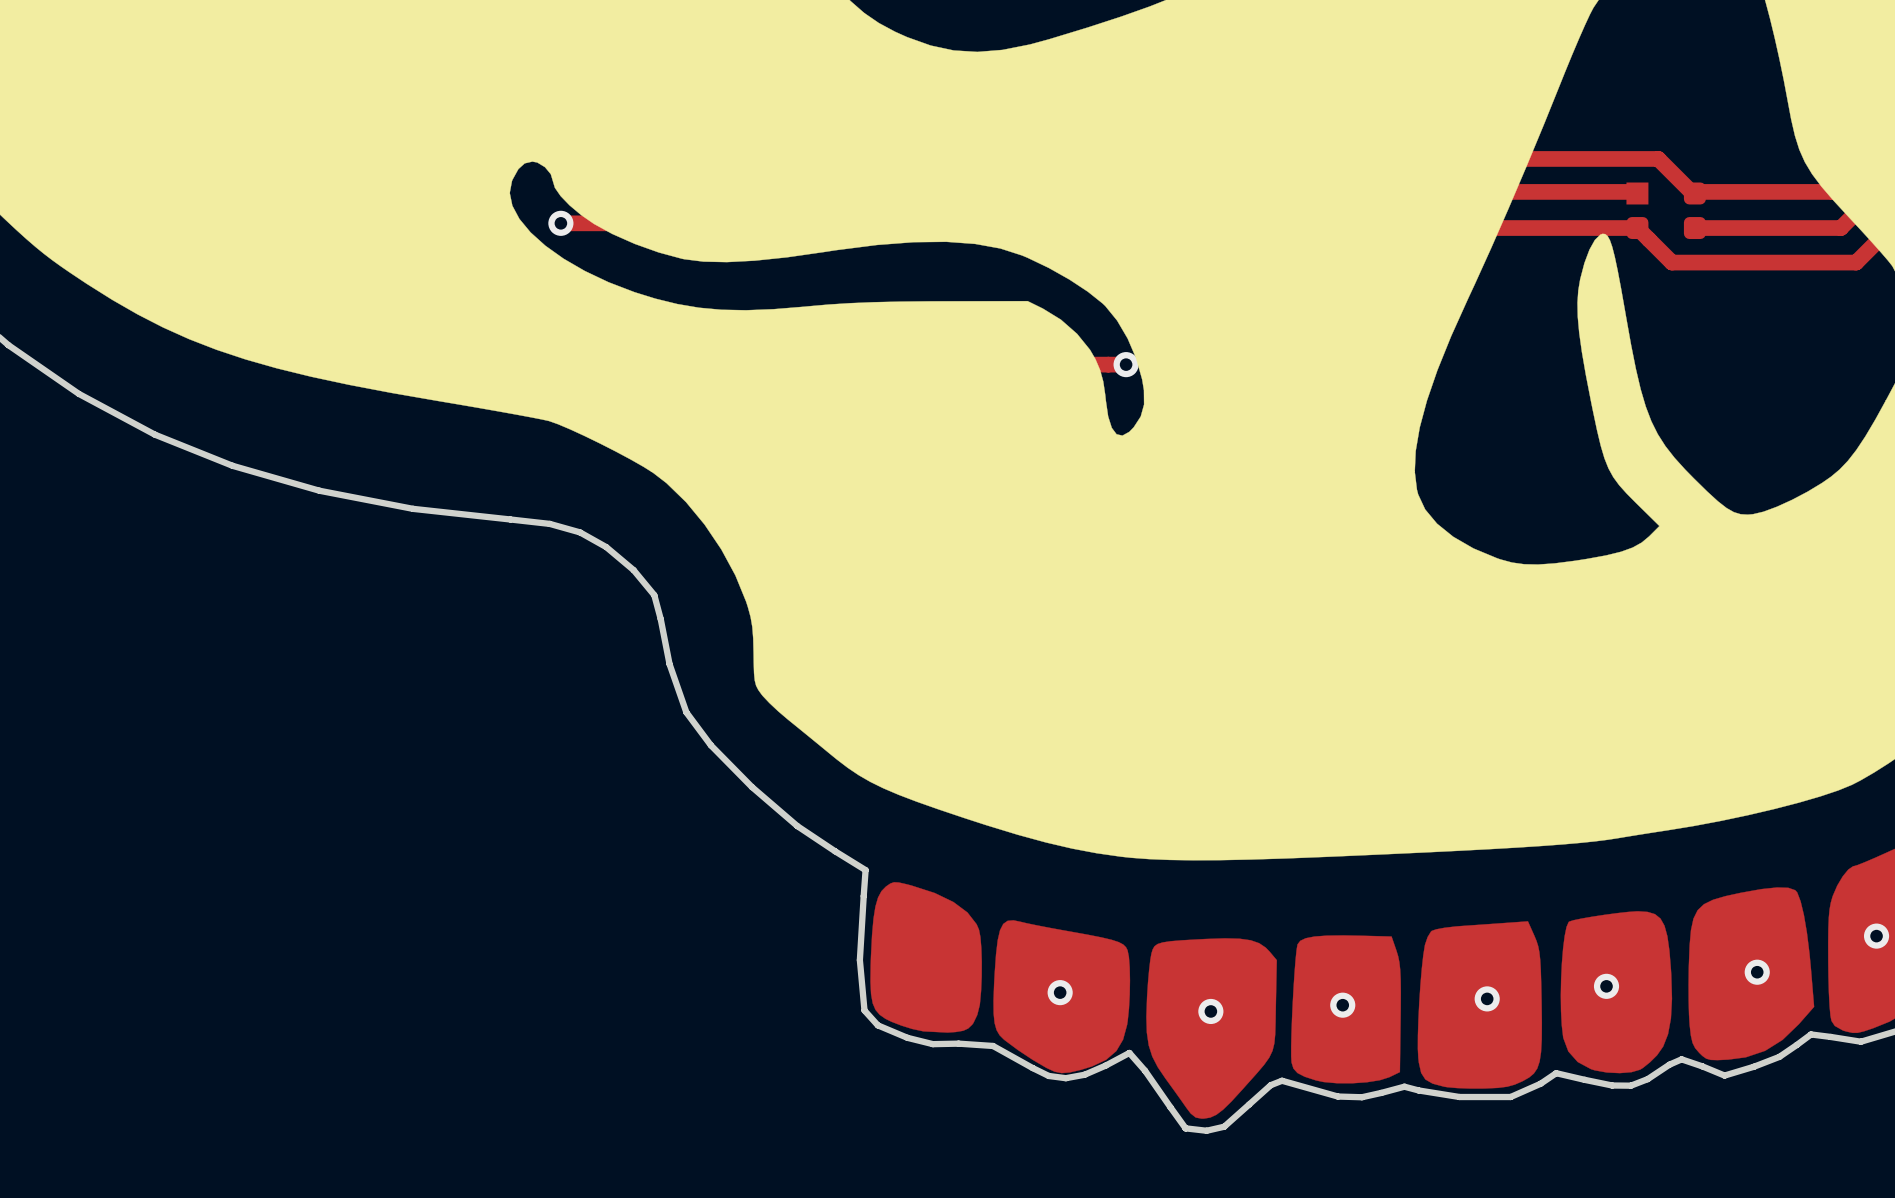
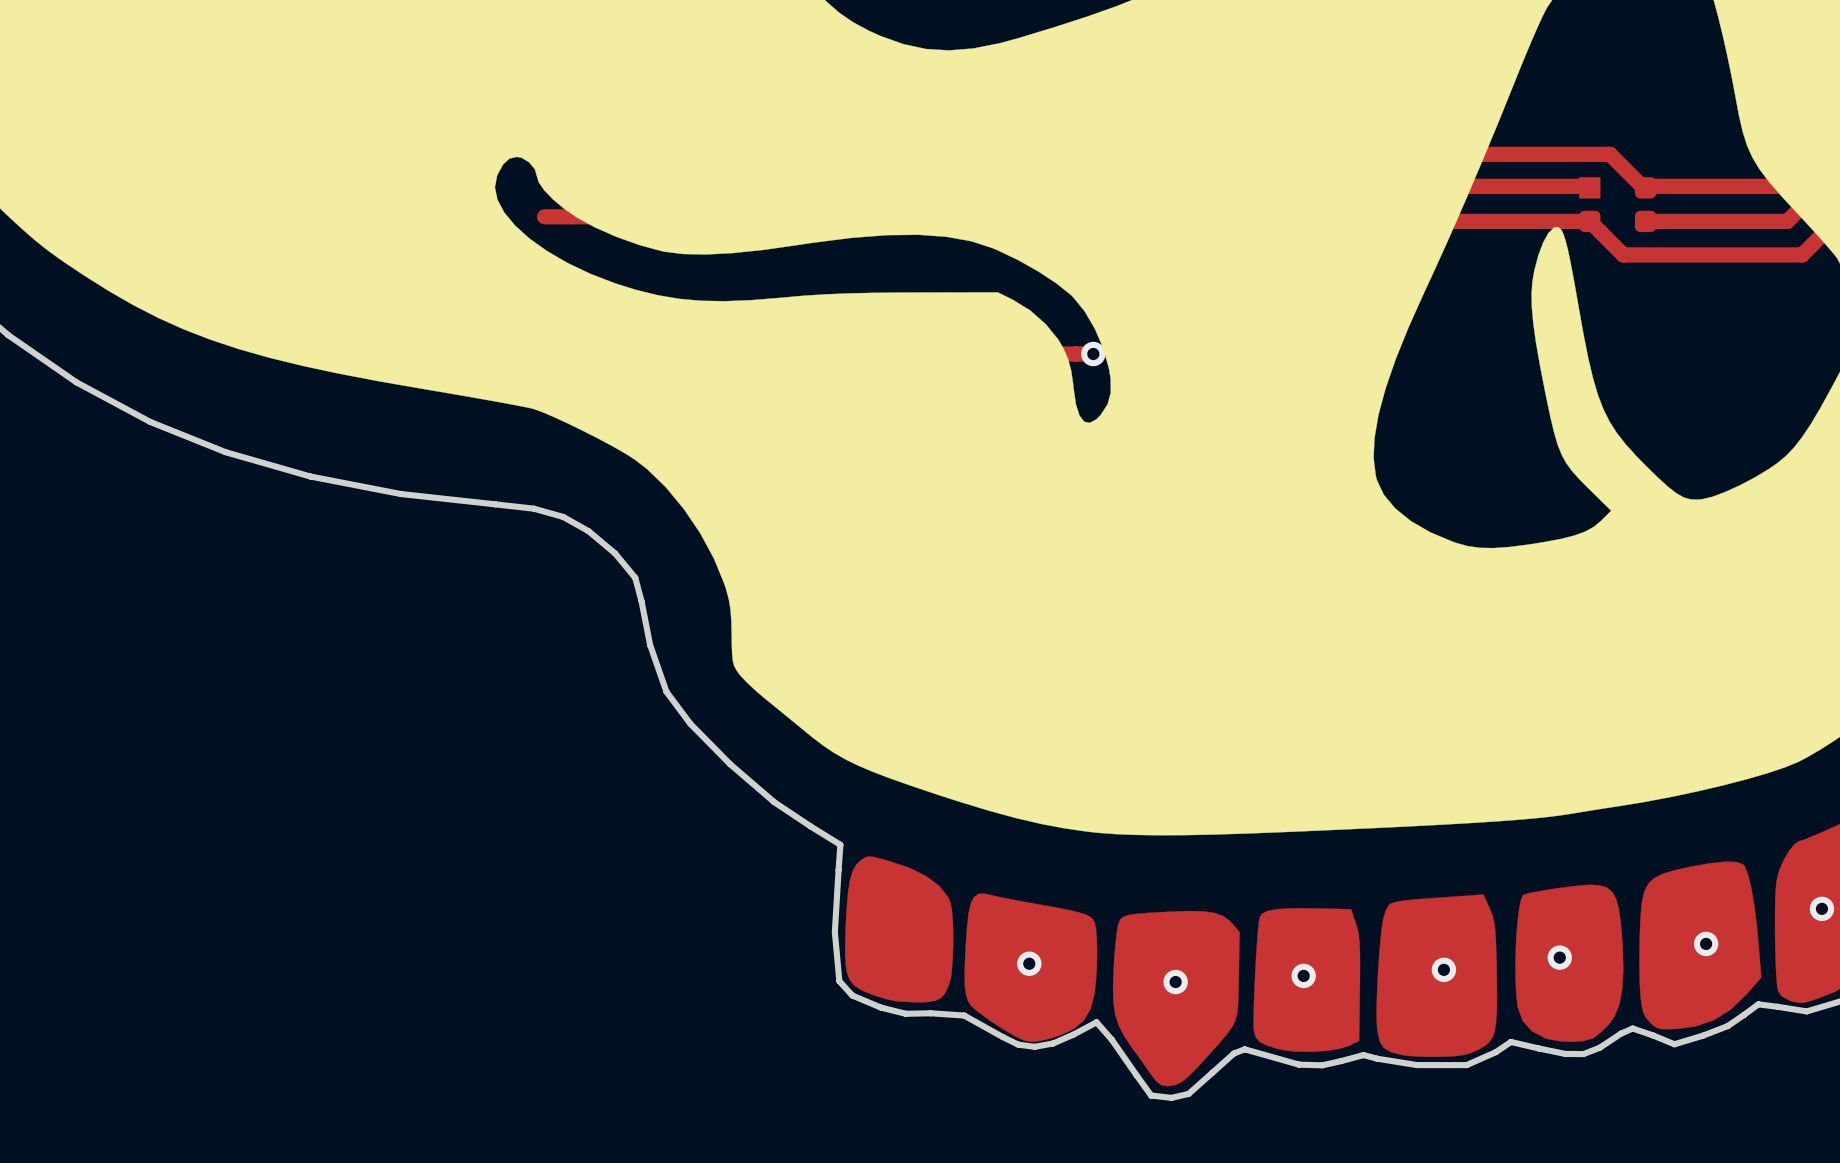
via: (560, 223) -> none

